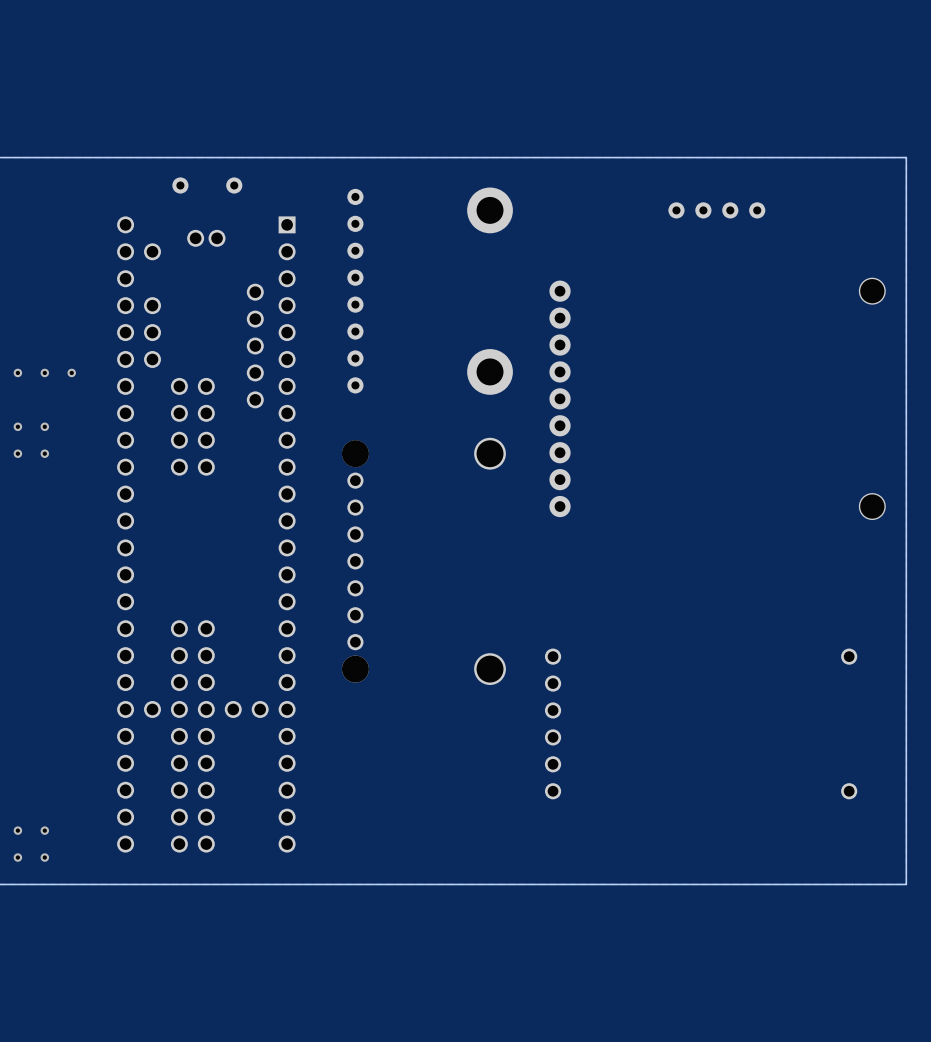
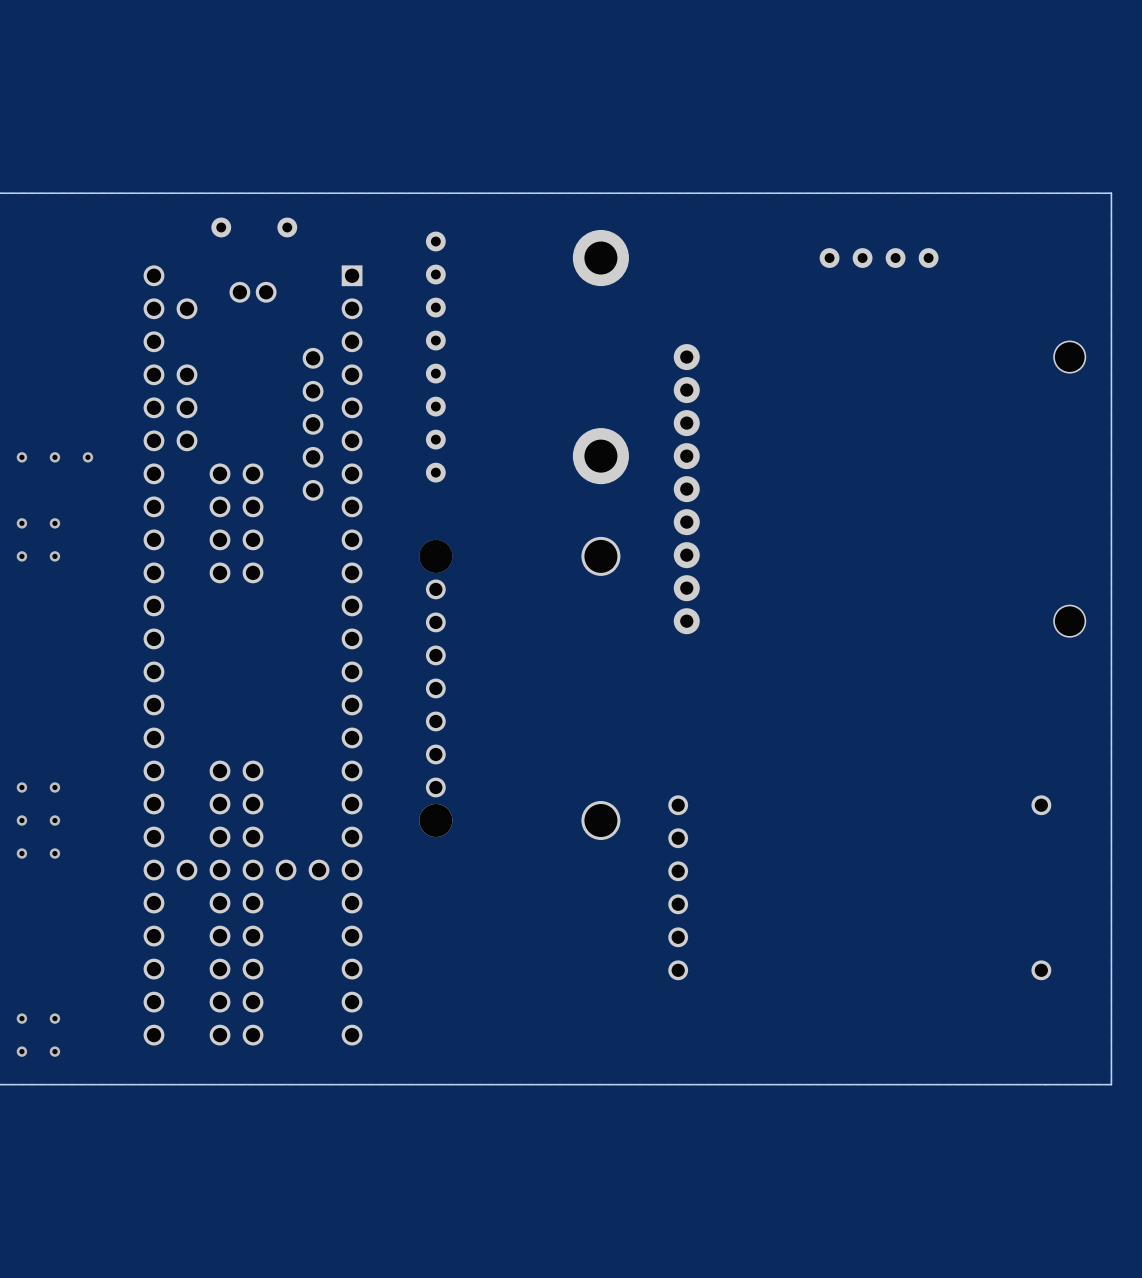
via: none -> (21, 787)
via: none -> (54, 787)
via: none -> (21, 820)
via: none -> (54, 820)
via: none -> (21, 853)
via: none -> (54, 853)

